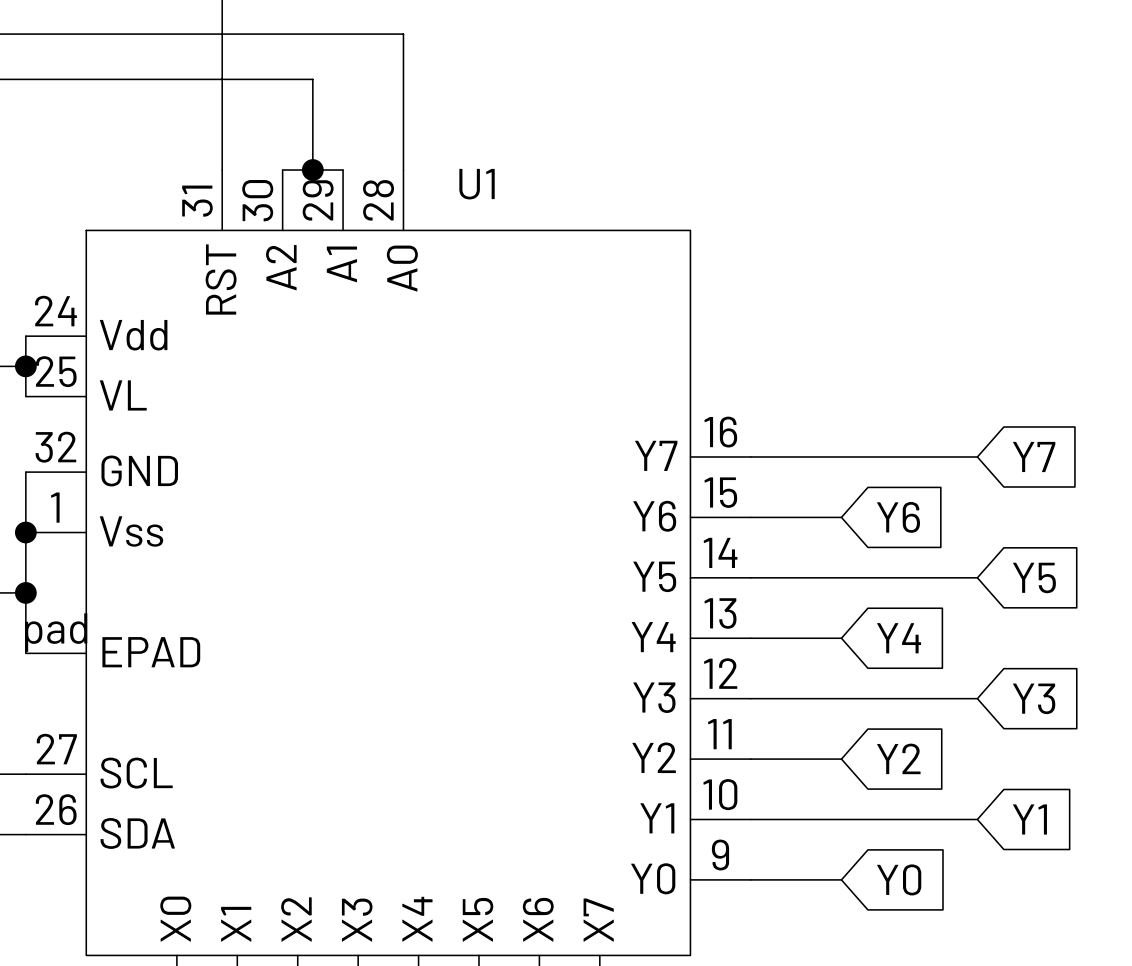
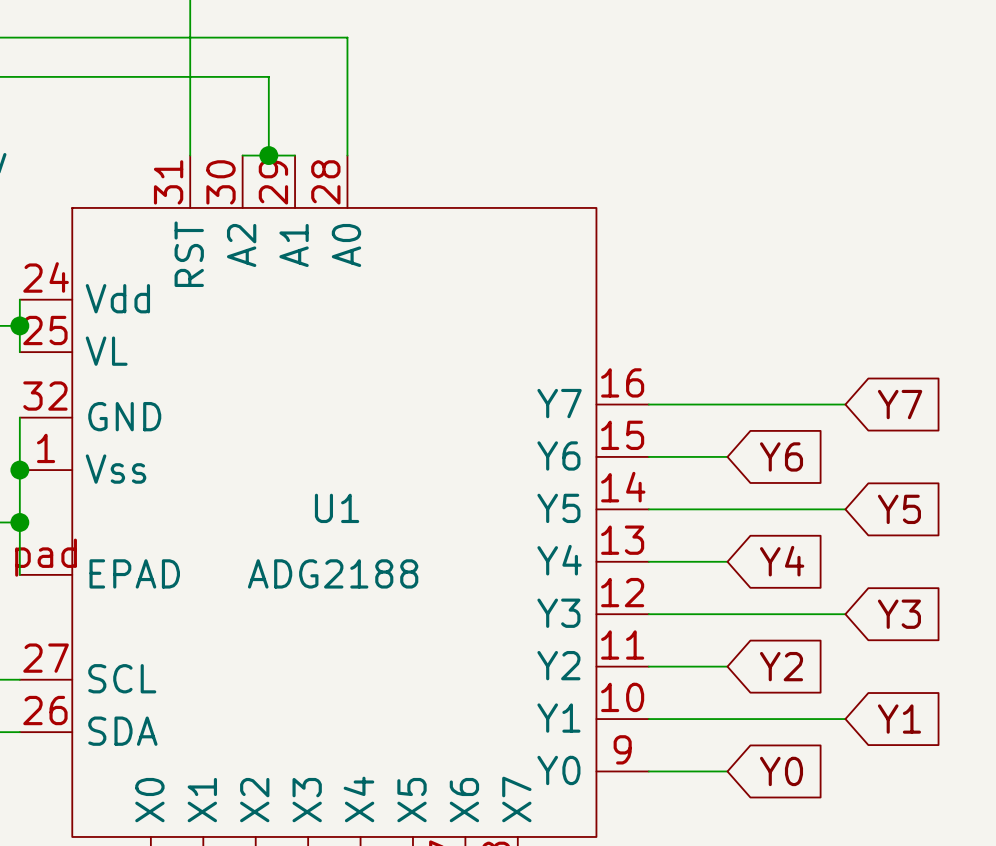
U1 name position: U1 (477, 184) -> U1 (337, 508)
U1 value: none -> ADG2188 (333, 573)

